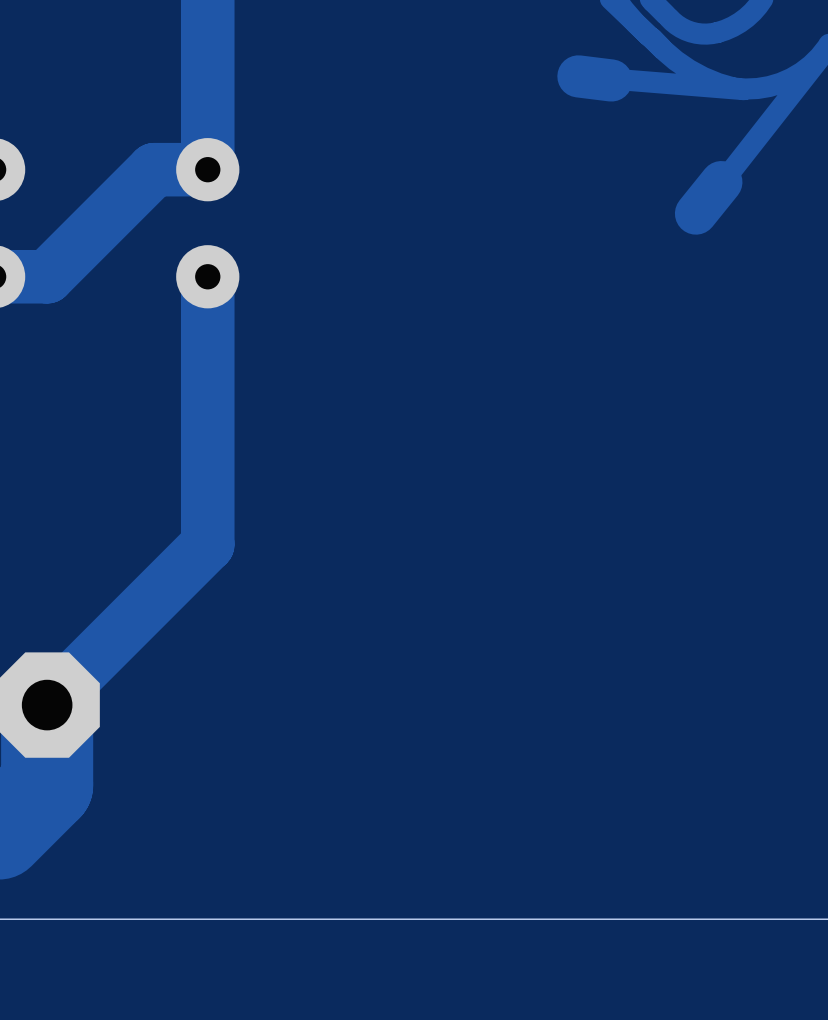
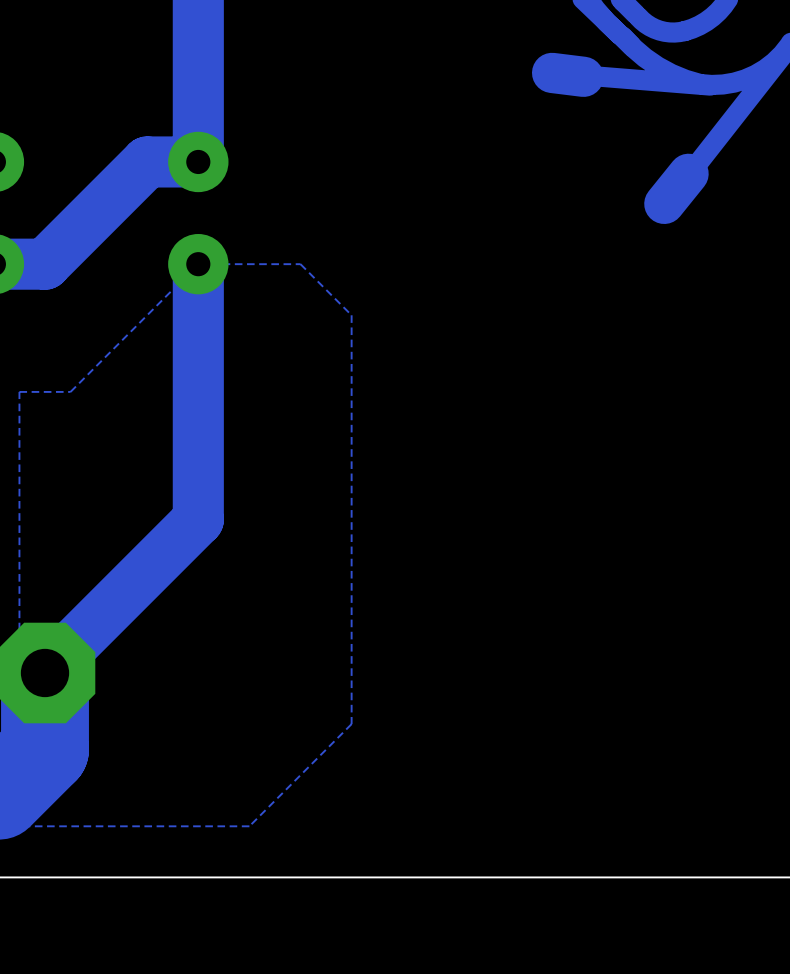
zone outline: none -> (300, 264) (198, 264) (70, 391) (19, 391) (19, 826) (249, 826) (351, 724) (351, 315) (300, 264)

